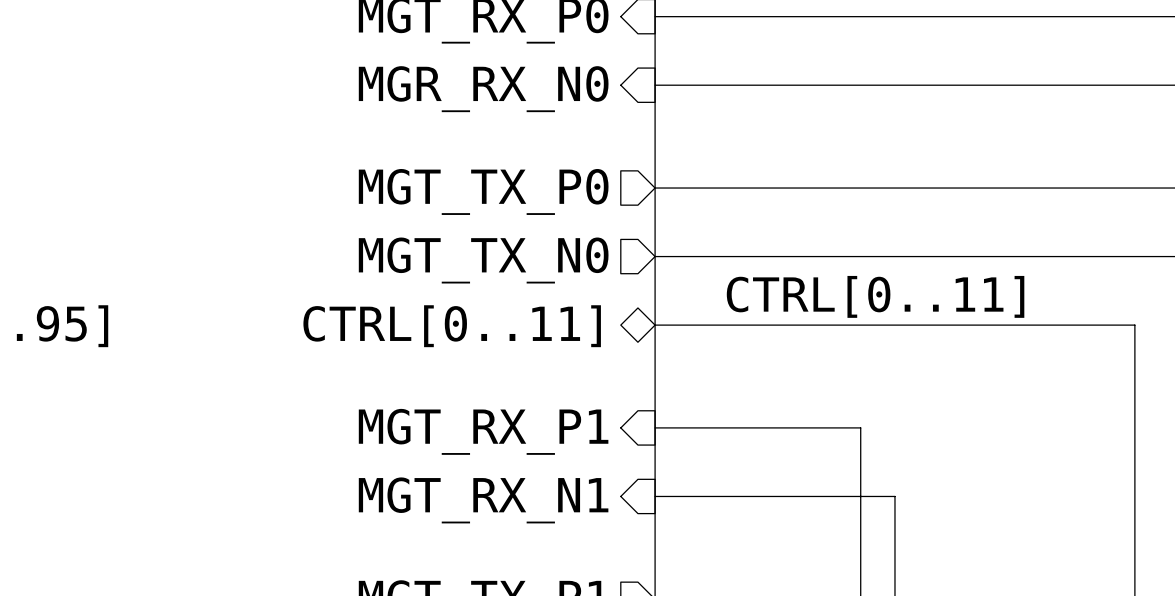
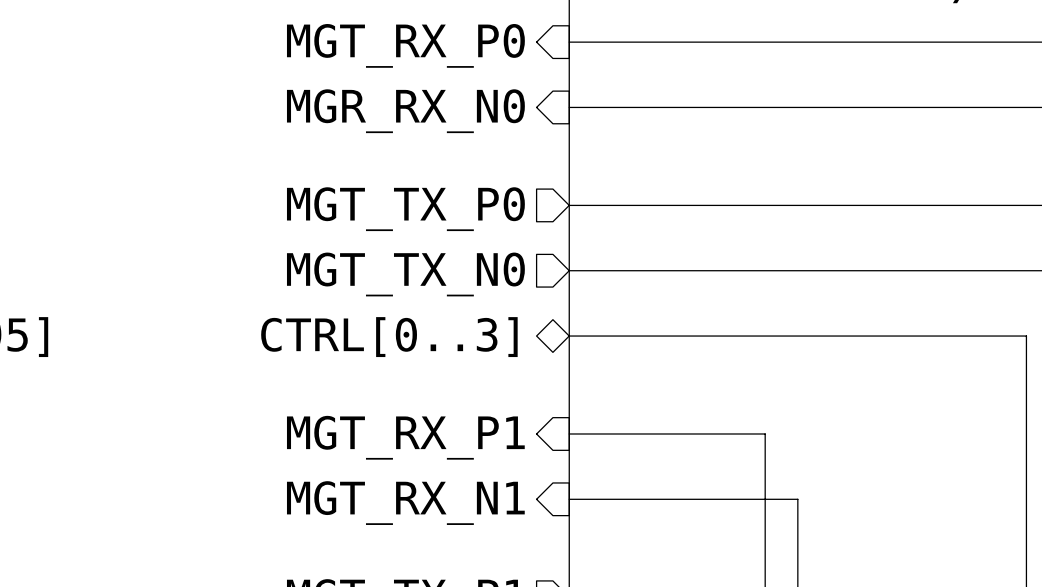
label: CTRL[0..11] (875, 296) -> none
sheet pin: CTRL[0..11] (452, 326) -> CTRL[0..3] (389, 337)

